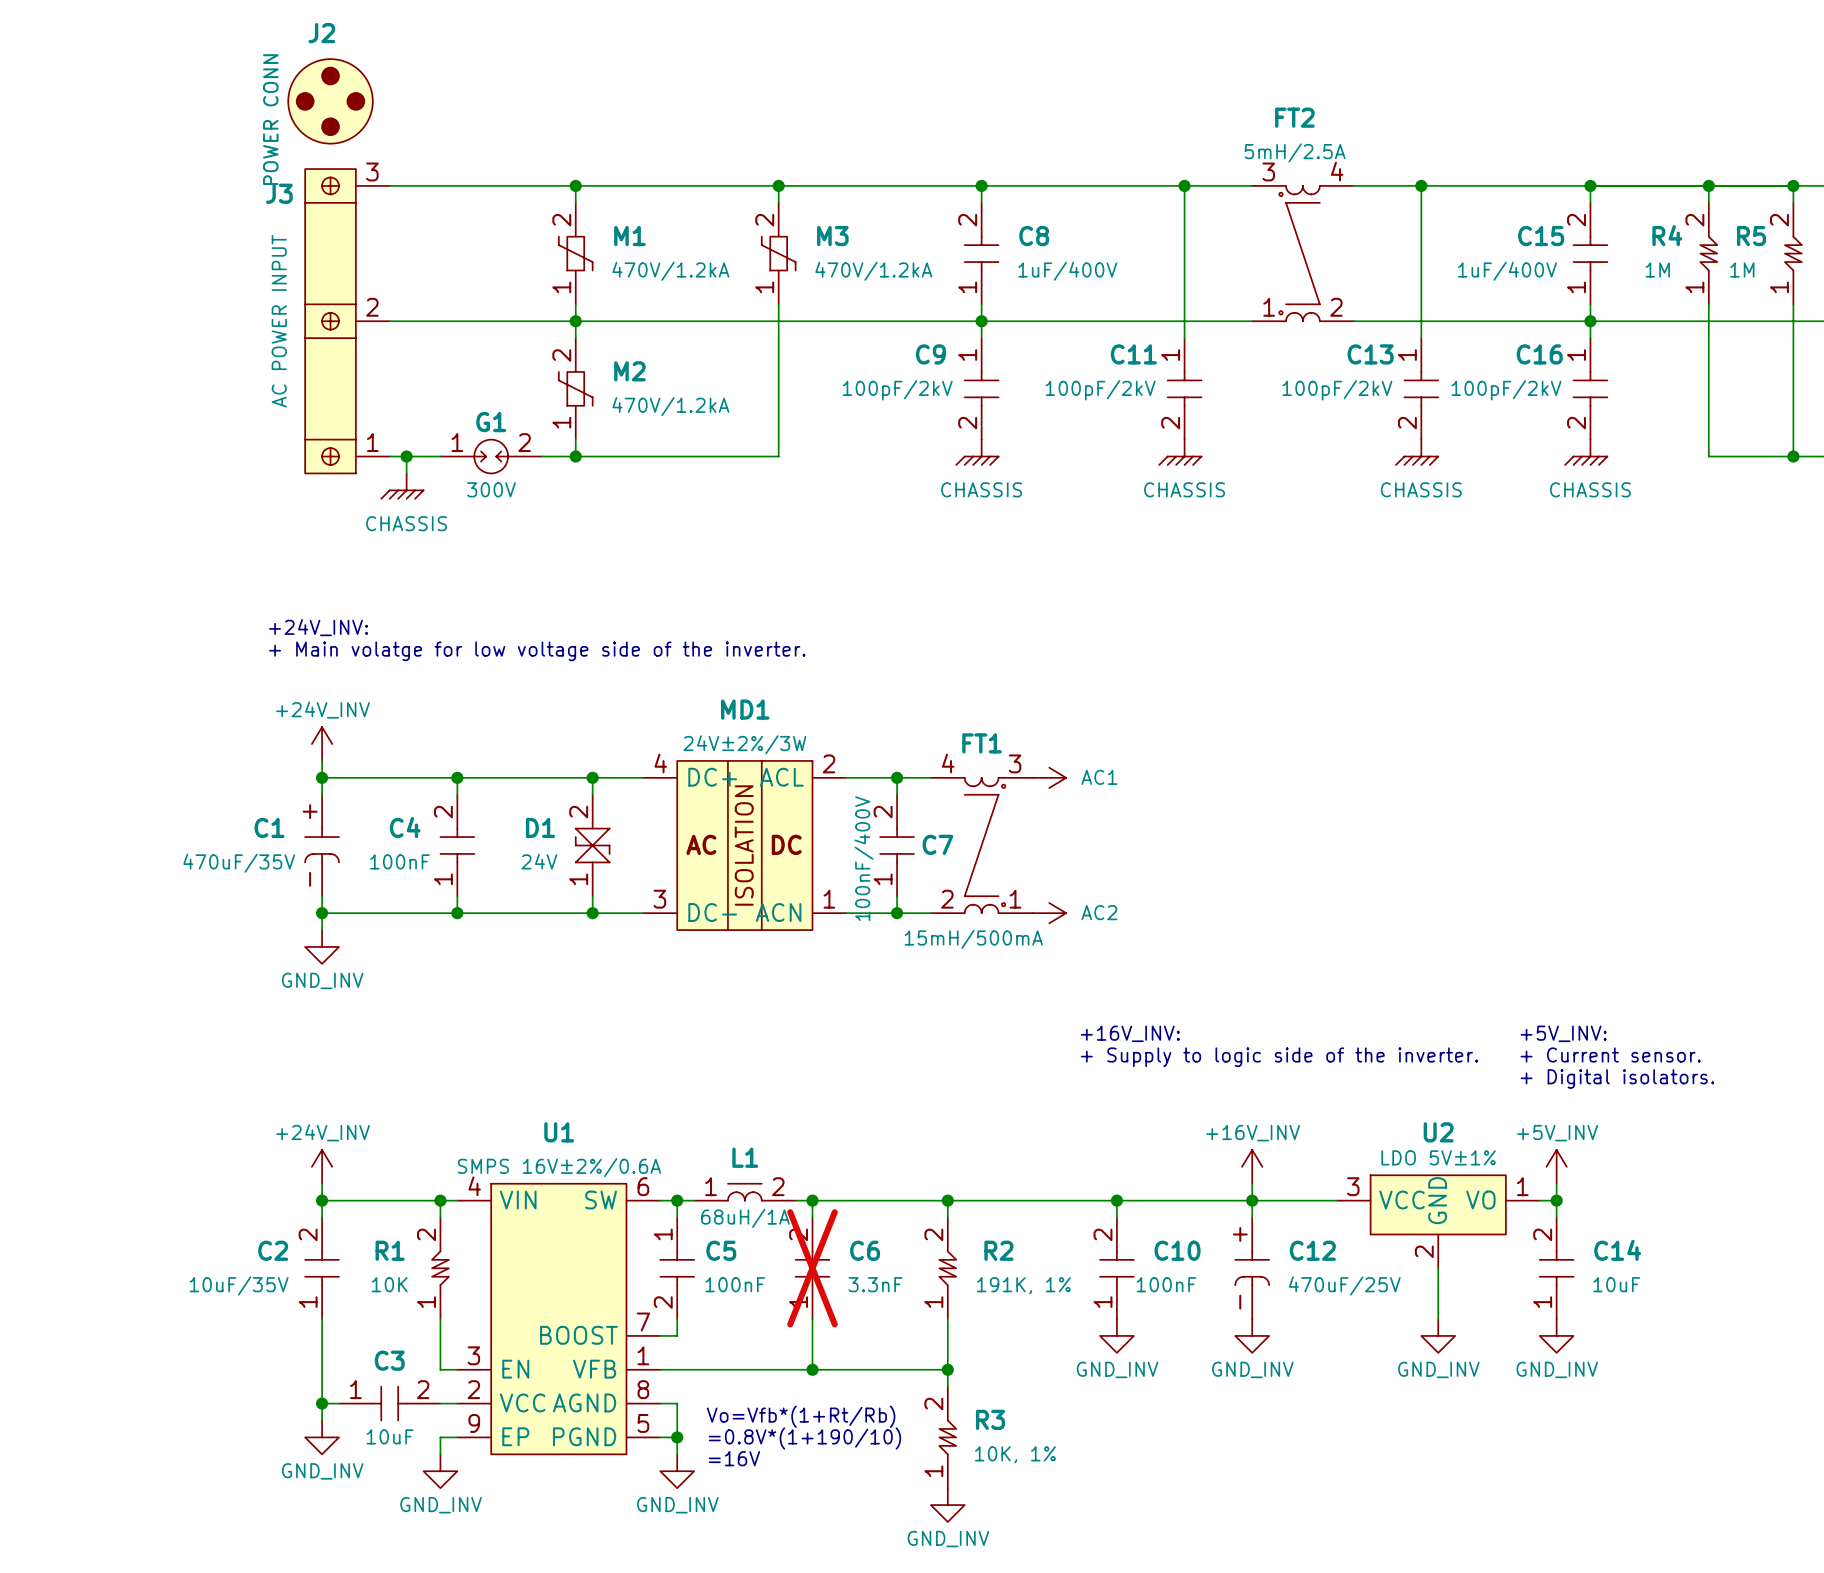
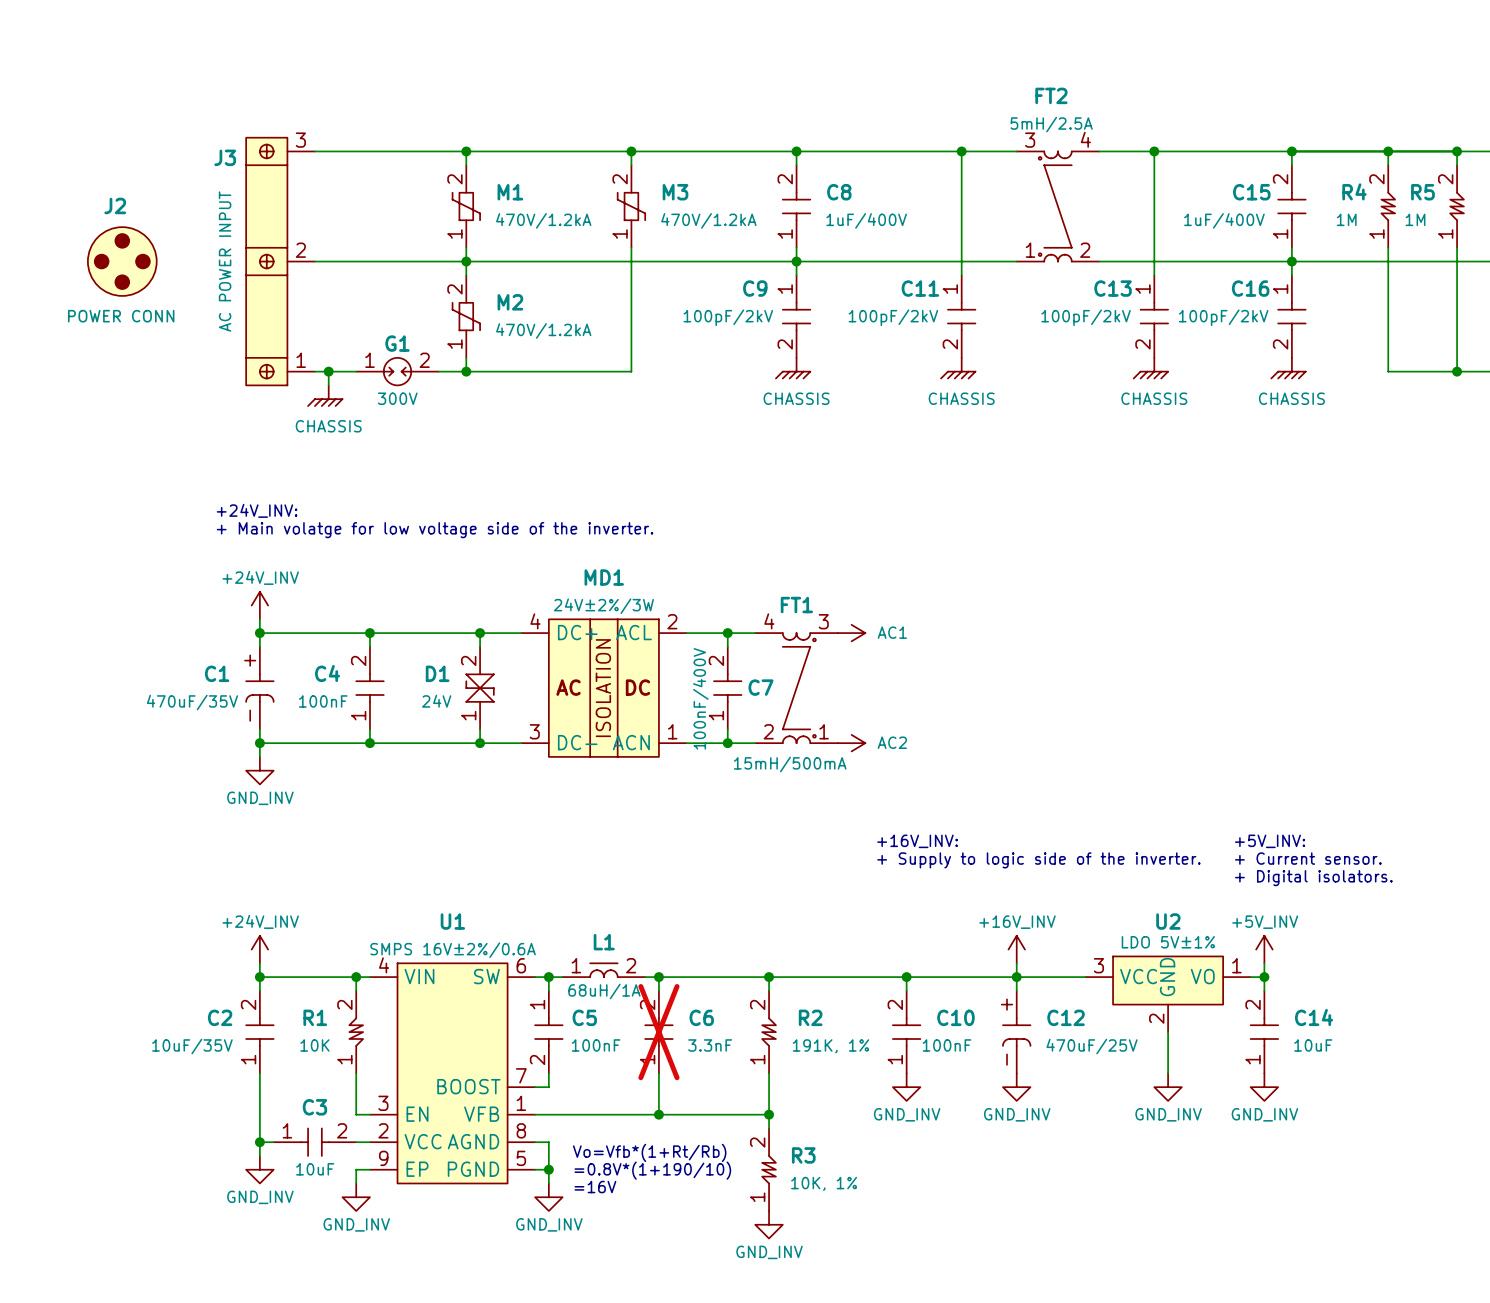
J2 position: (330, 101) -> (122, 261)
J2 value rotation: 0° (270, 119) -> 90° clockwise (121, 316)

